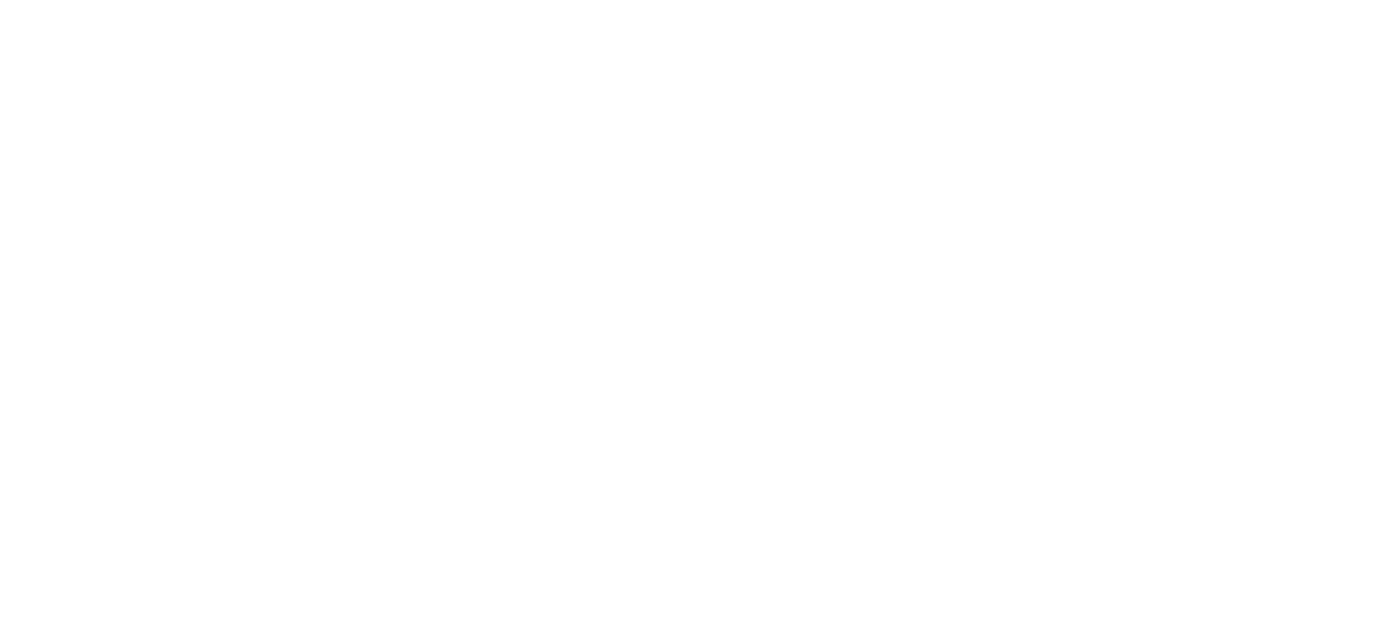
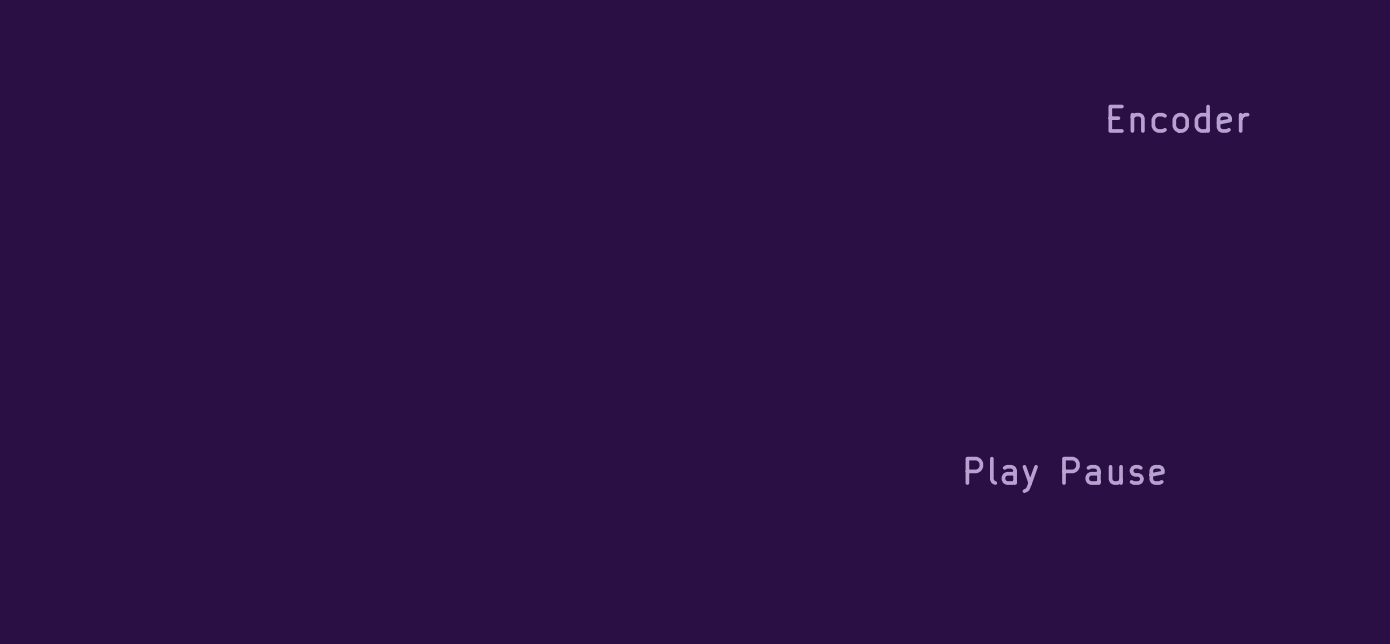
text: none -> Encoder (1178, 118)
text: none -> Play Pause (1065, 474)

